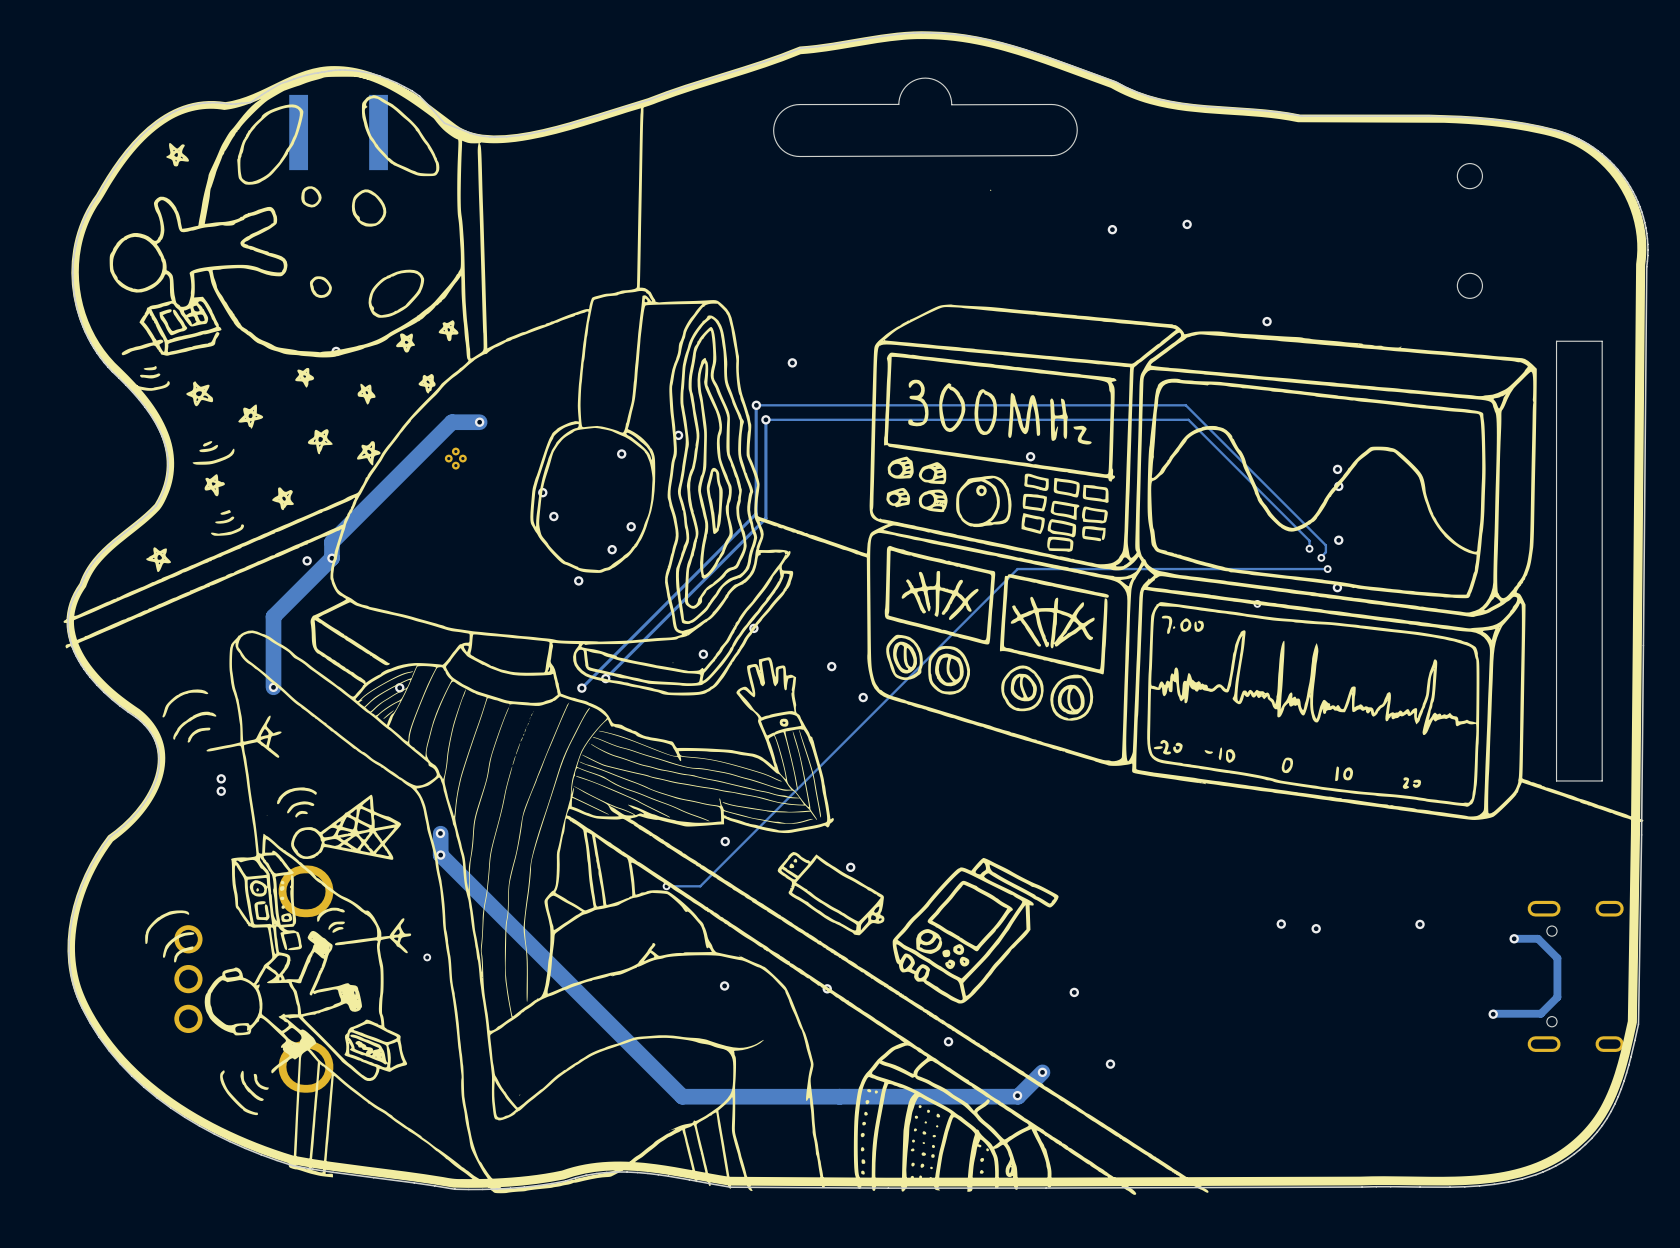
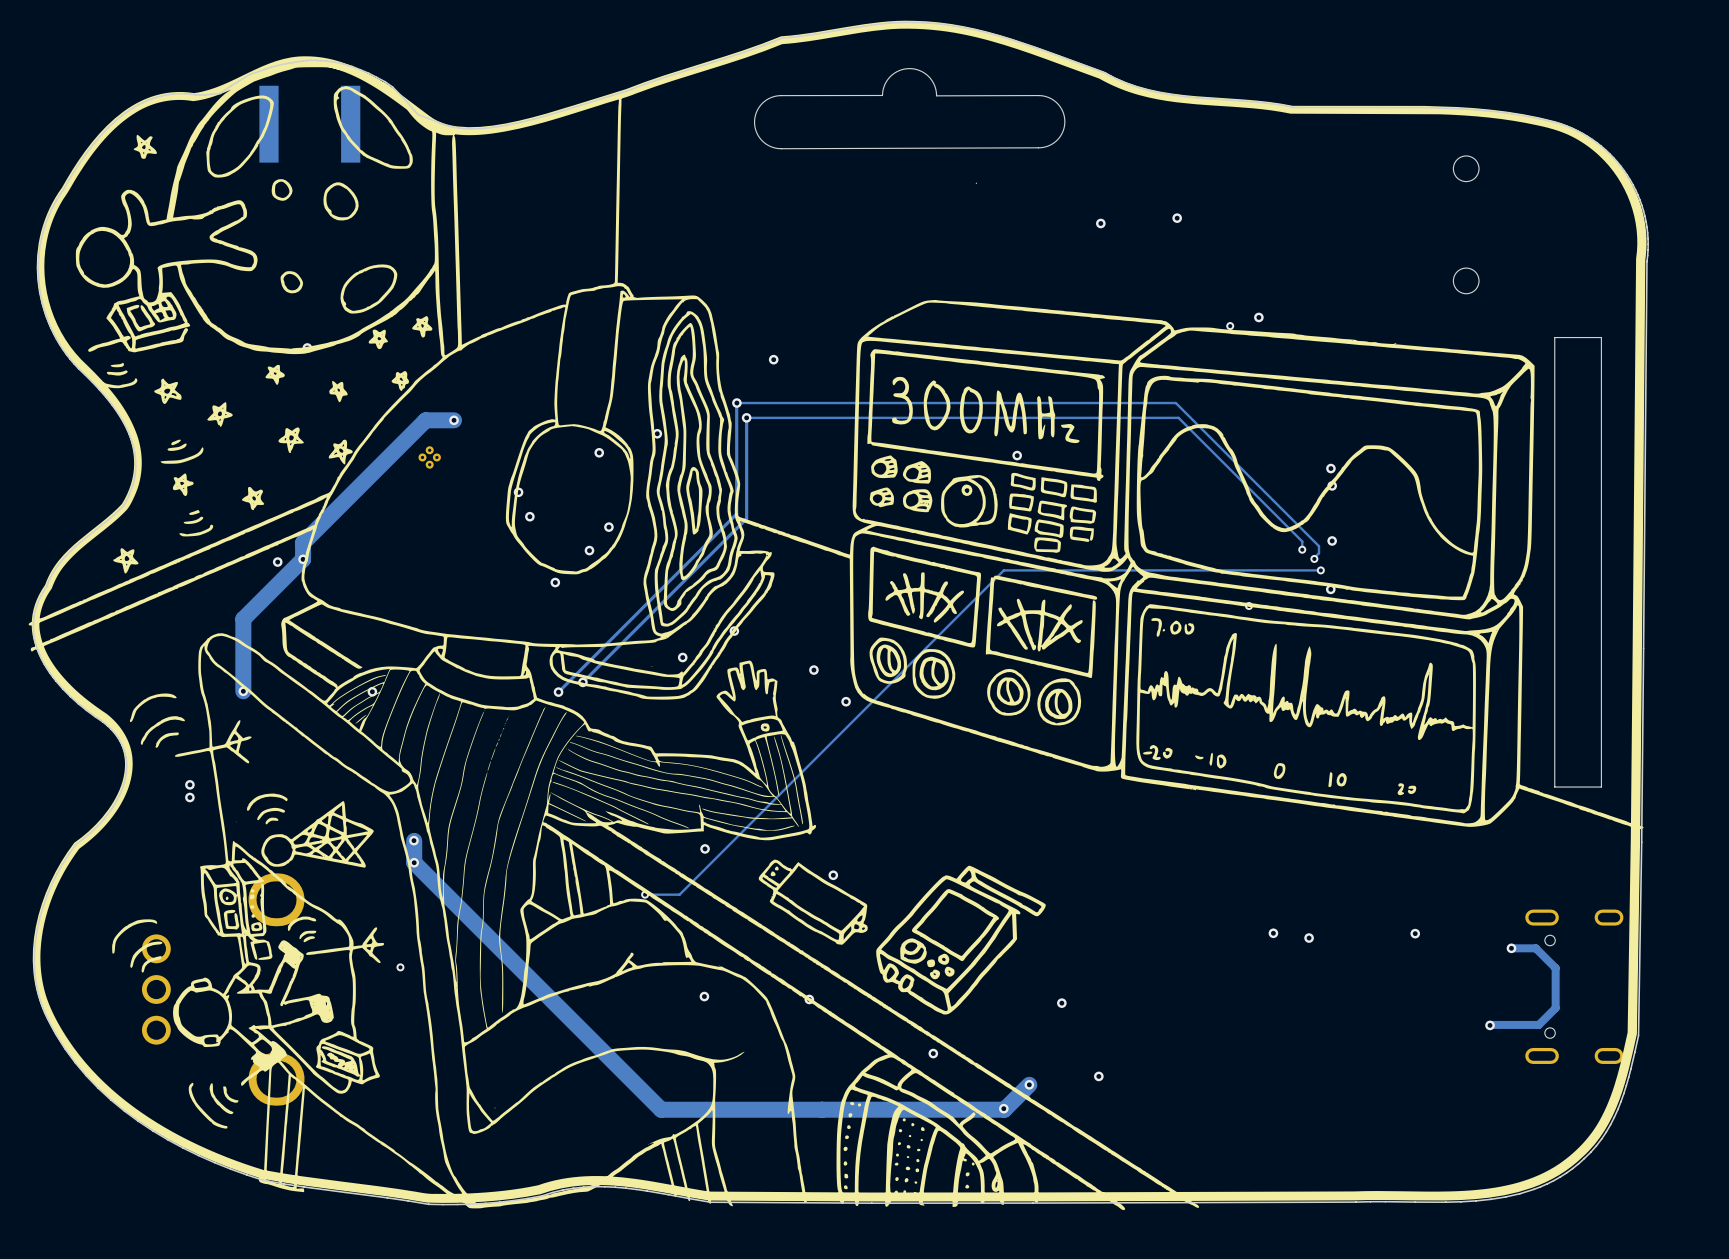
via: none -> (1230, 326)

